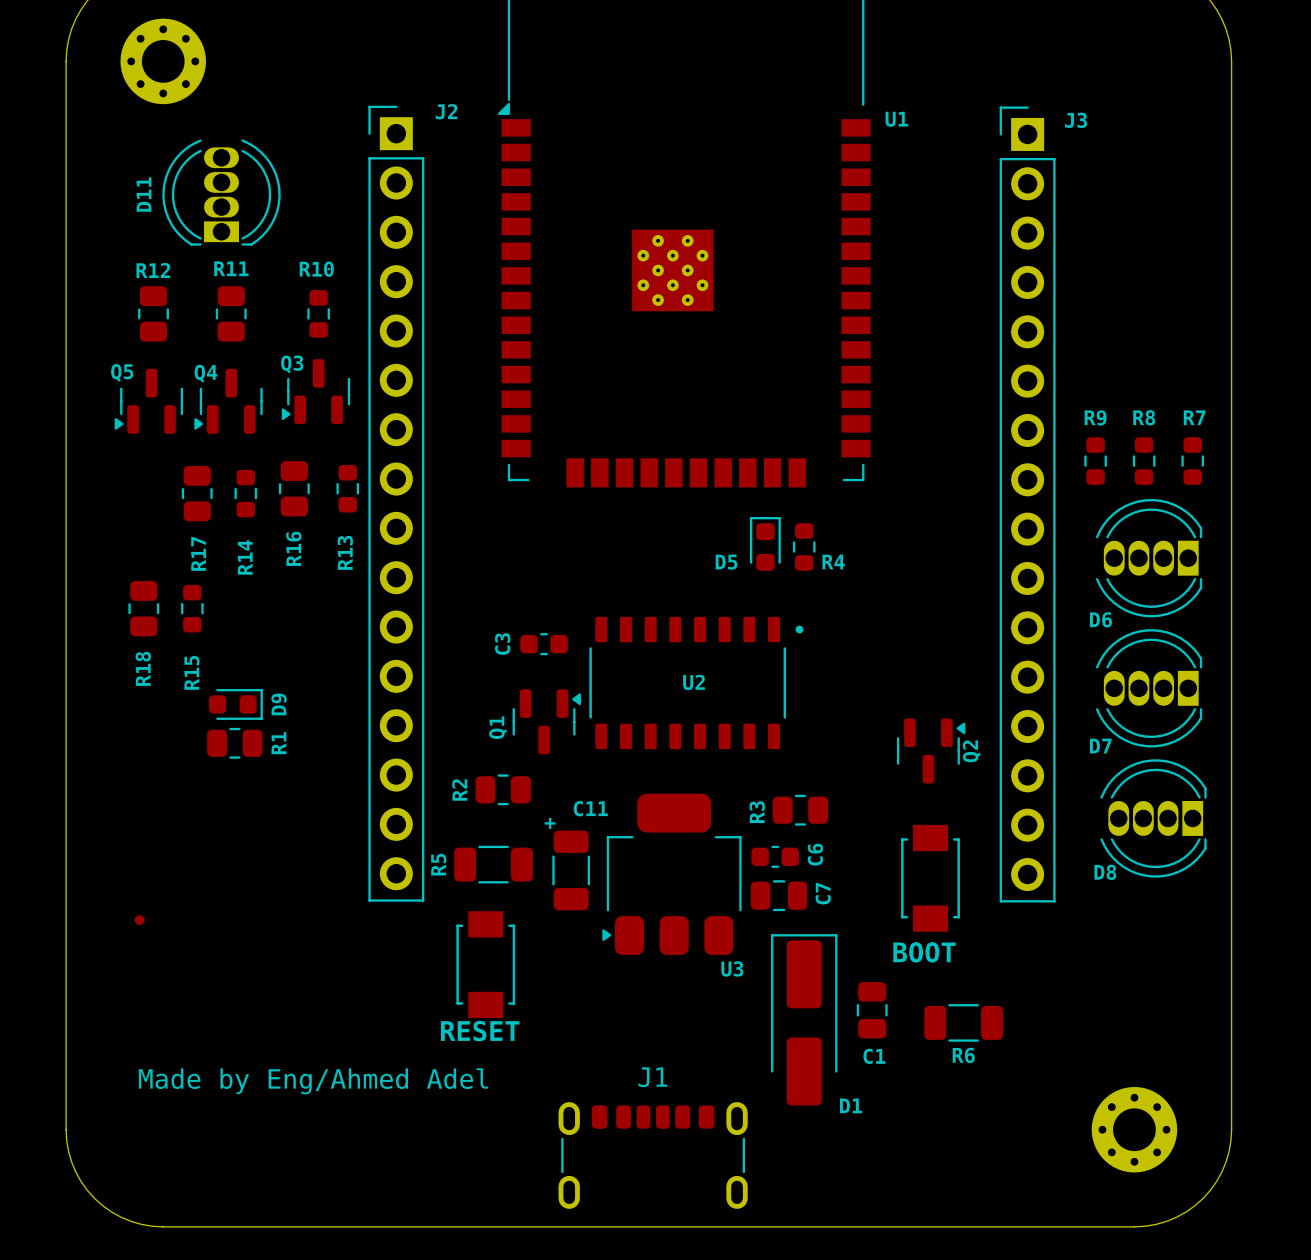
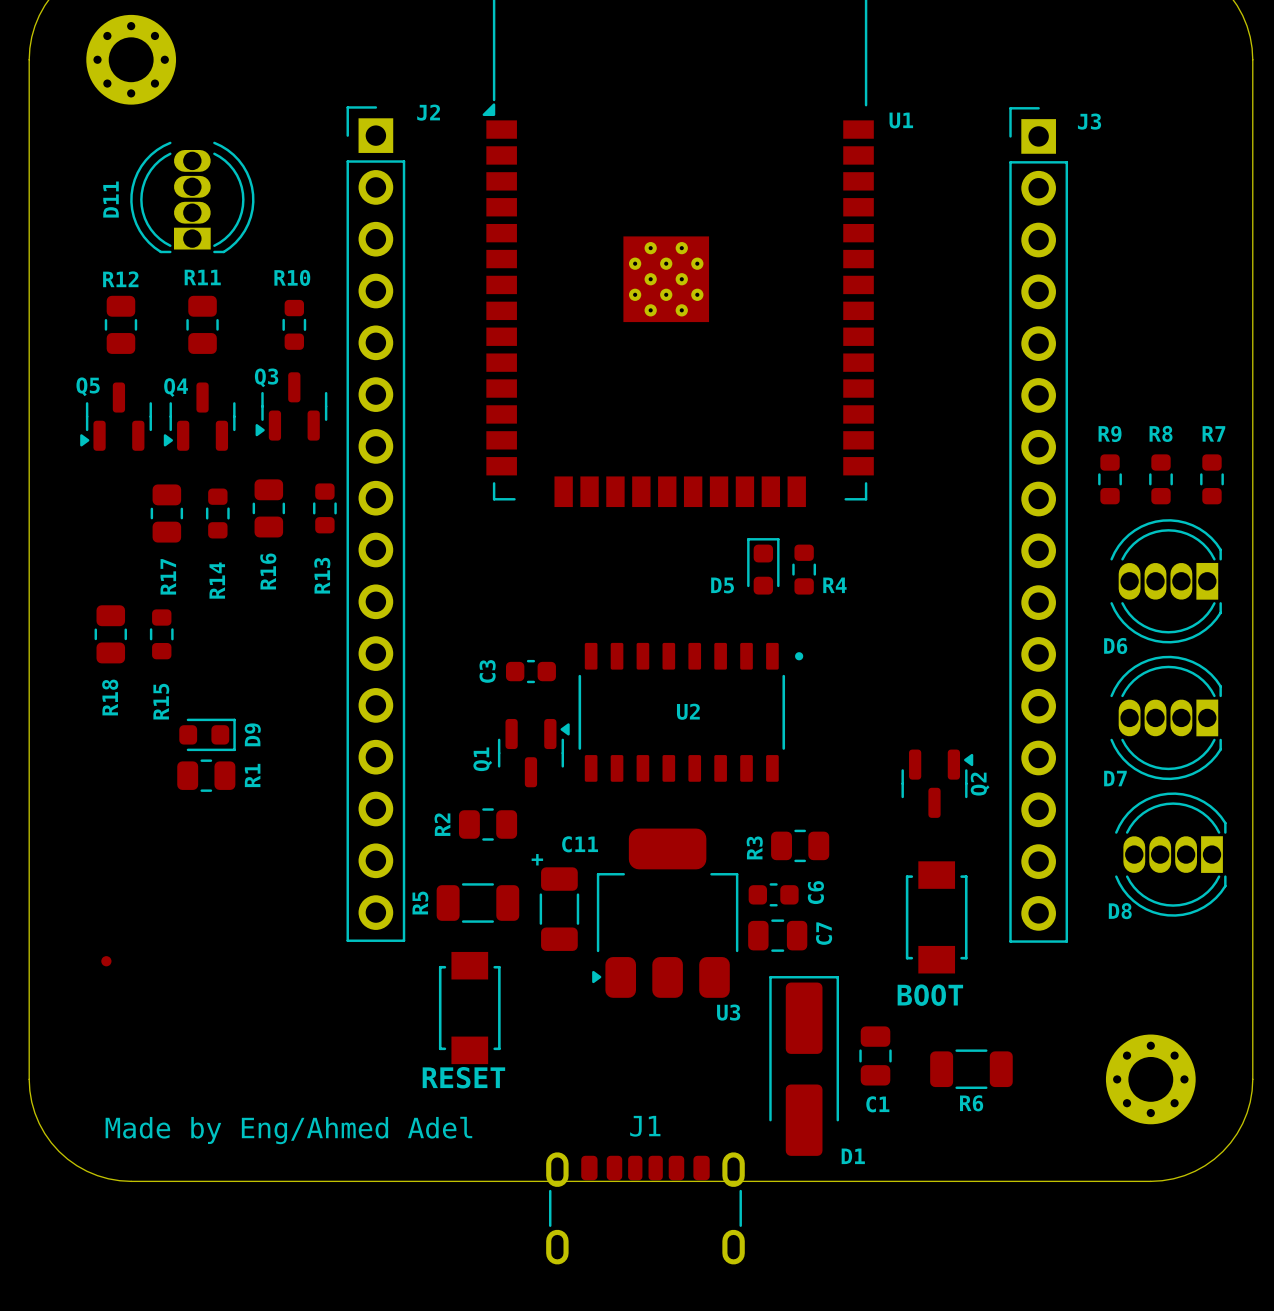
board edge: (66, 1032) (66, 1140) (75, 1171) (87, 1190) (111, 1211) (131, 1221) (163, 1226) (1134, 1226) (1156, 1224) (1176, 1217) (1195, 1205) (1216, 1181) (1226, 1161) (1231, 1129) (1231, 1032) -> (29, 1079) (34, 1113) (44, 1133) (59, 1151) (76, 1165) (97, 1175) (131, 1181) (1162, 1180) (1195, 1171) (1214, 1159) (1230, 1142) (1247, 1113) (1252, 1079)
part position: (1134, 1129) -> (1150, 1079)

